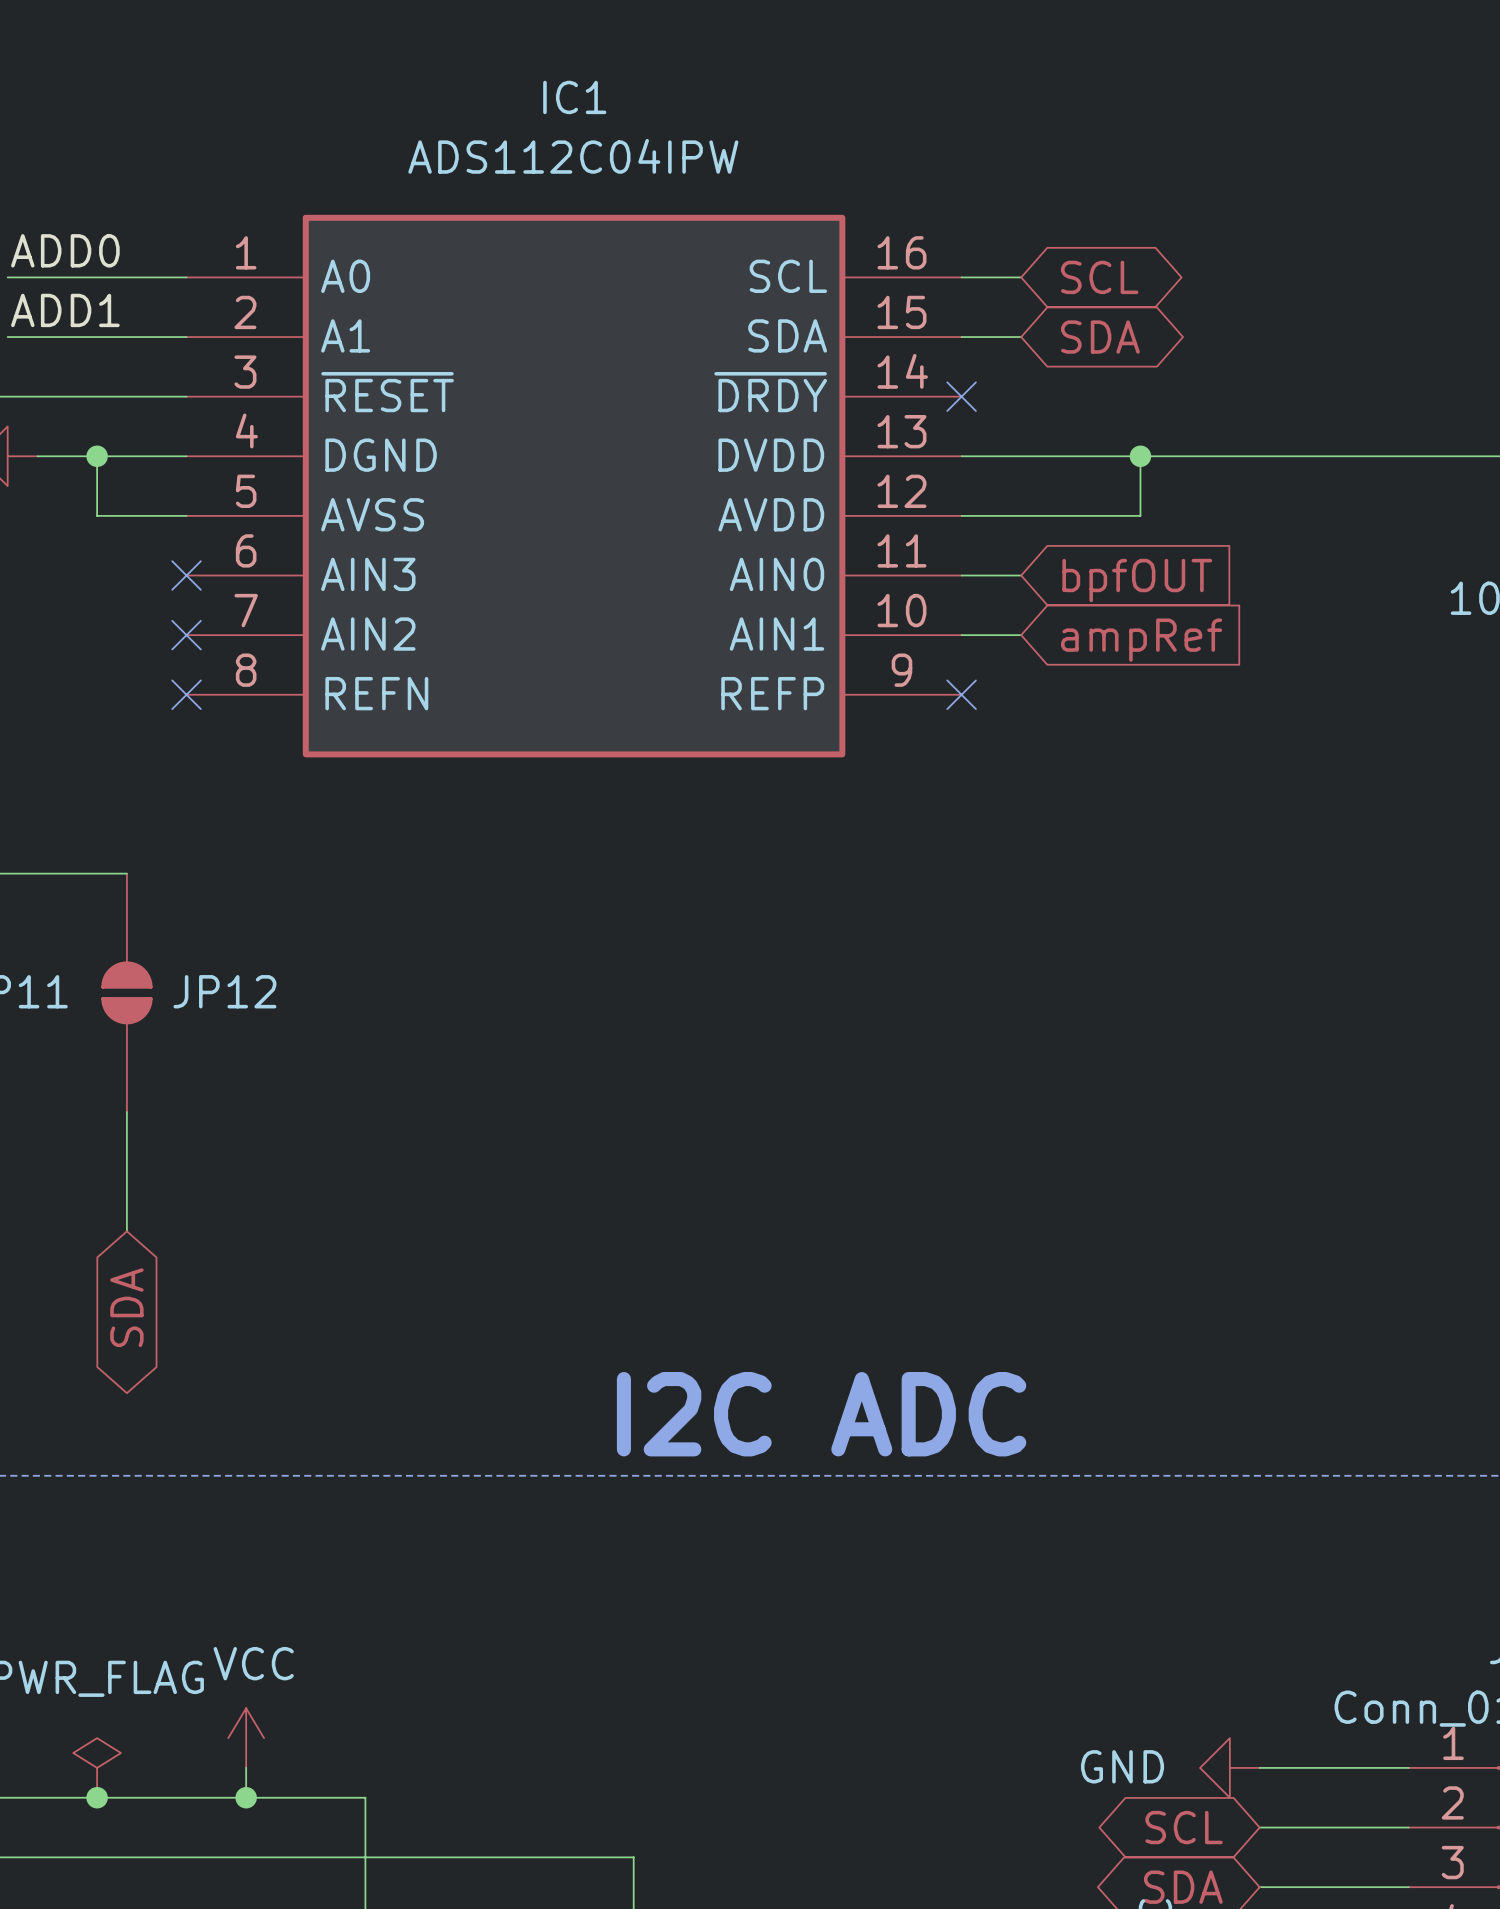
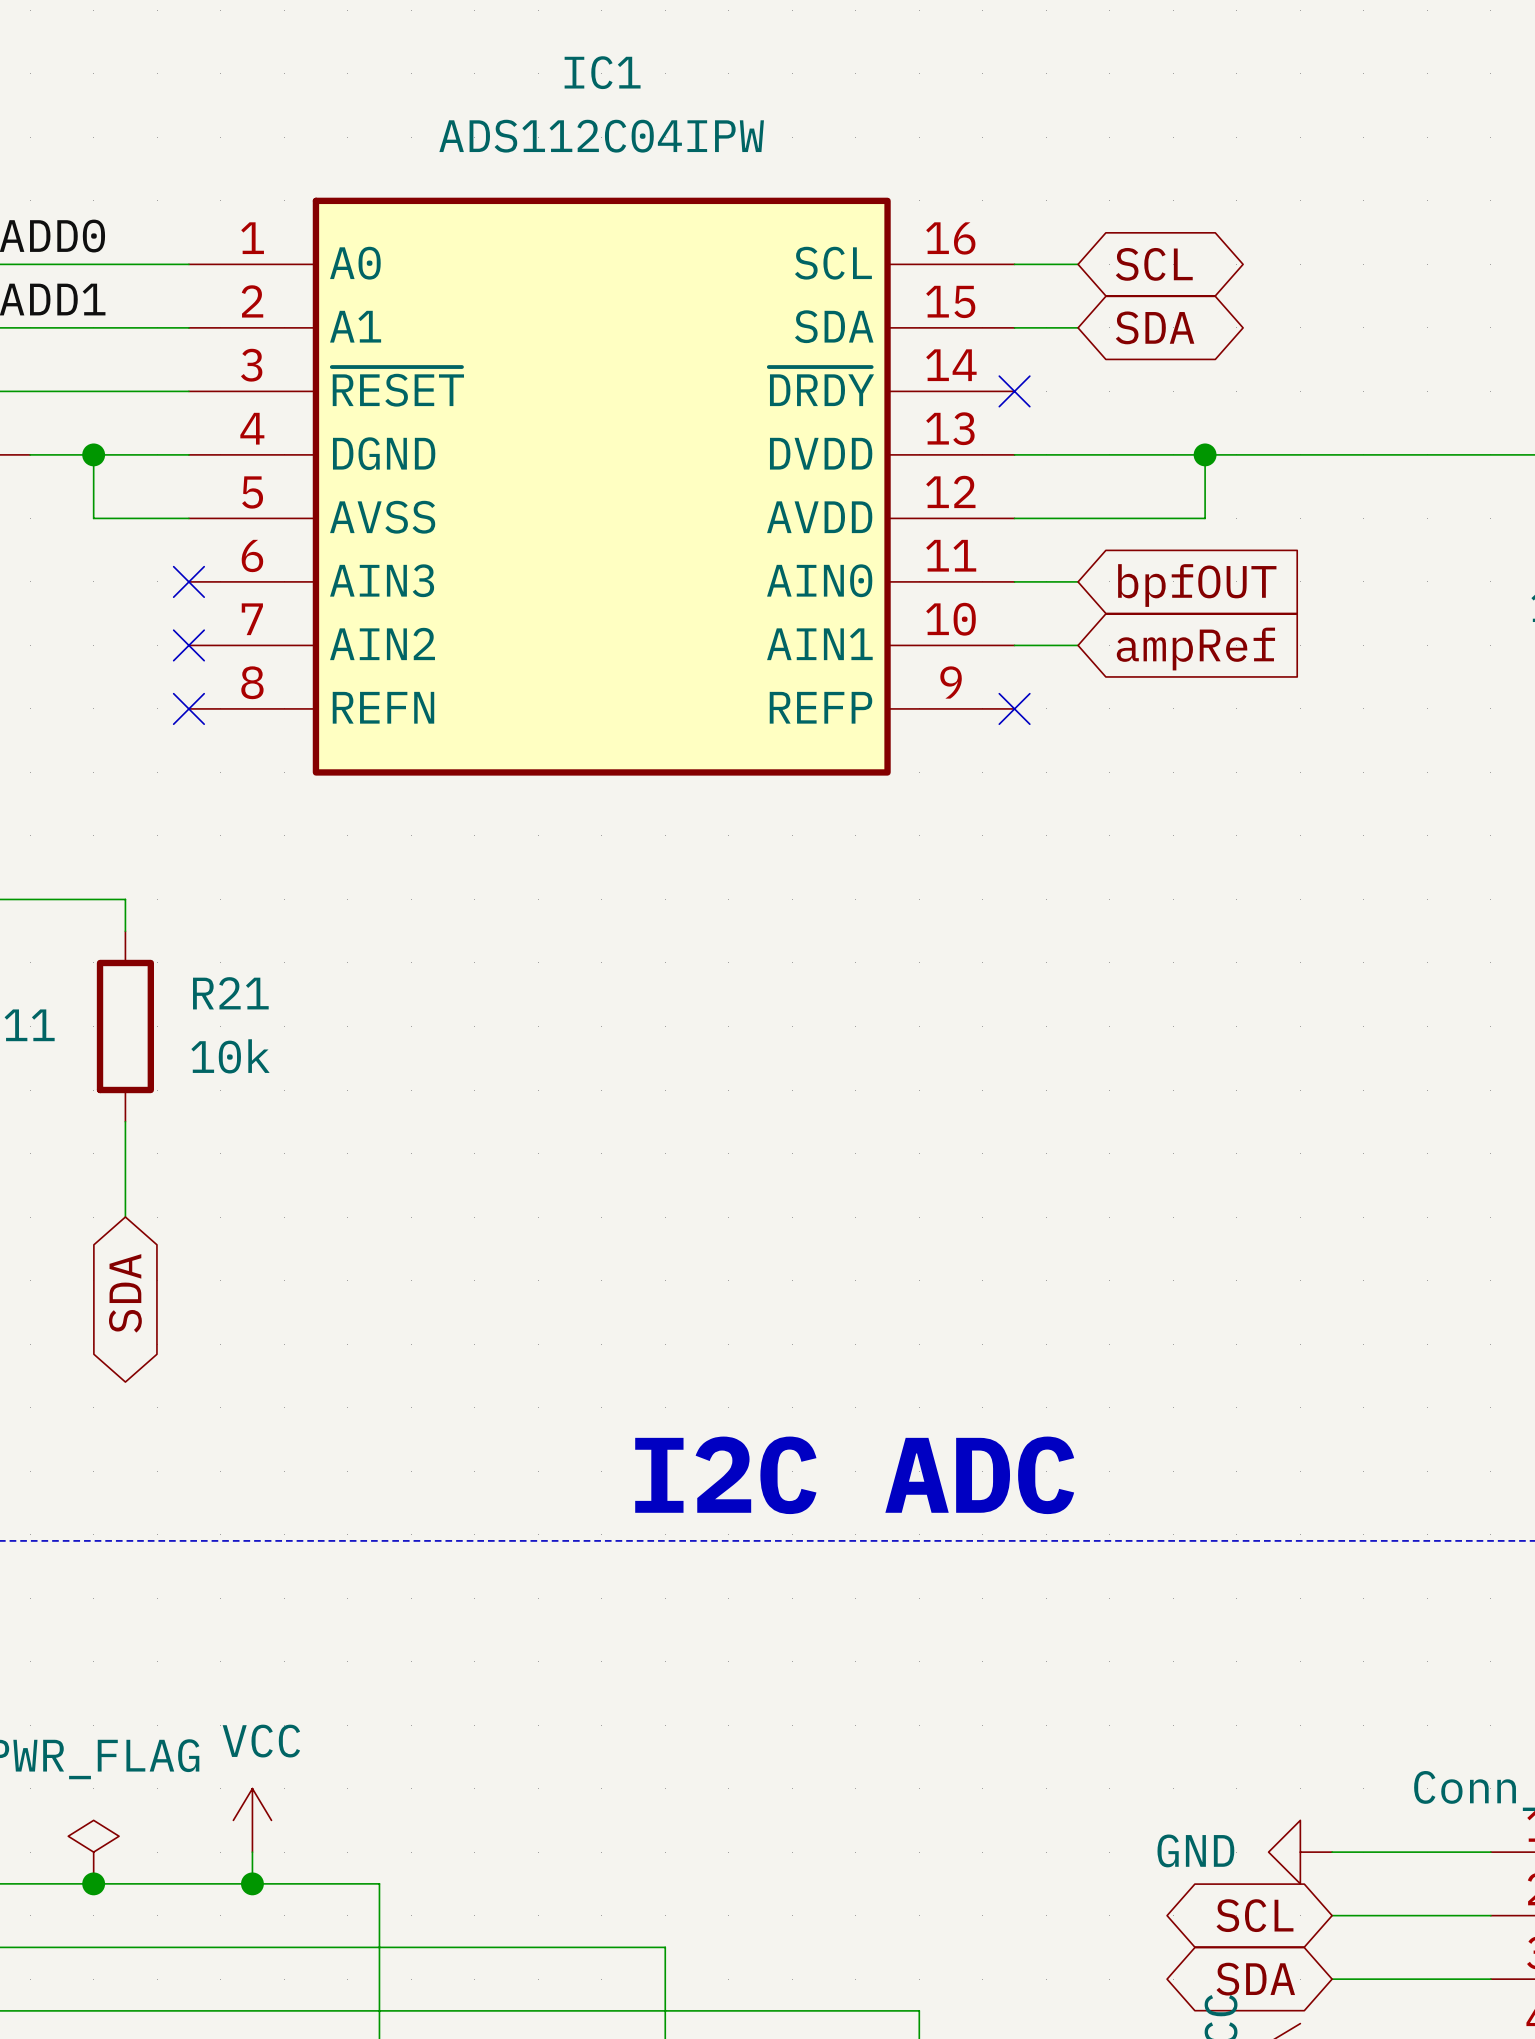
JP12: (126, 992) -> none
R21: none -> 10k (125, 1026)
wire: (126, 1171) (126, 1231) -> none
global label position: SDA (126, 1307) -> SDA (125, 1293)

